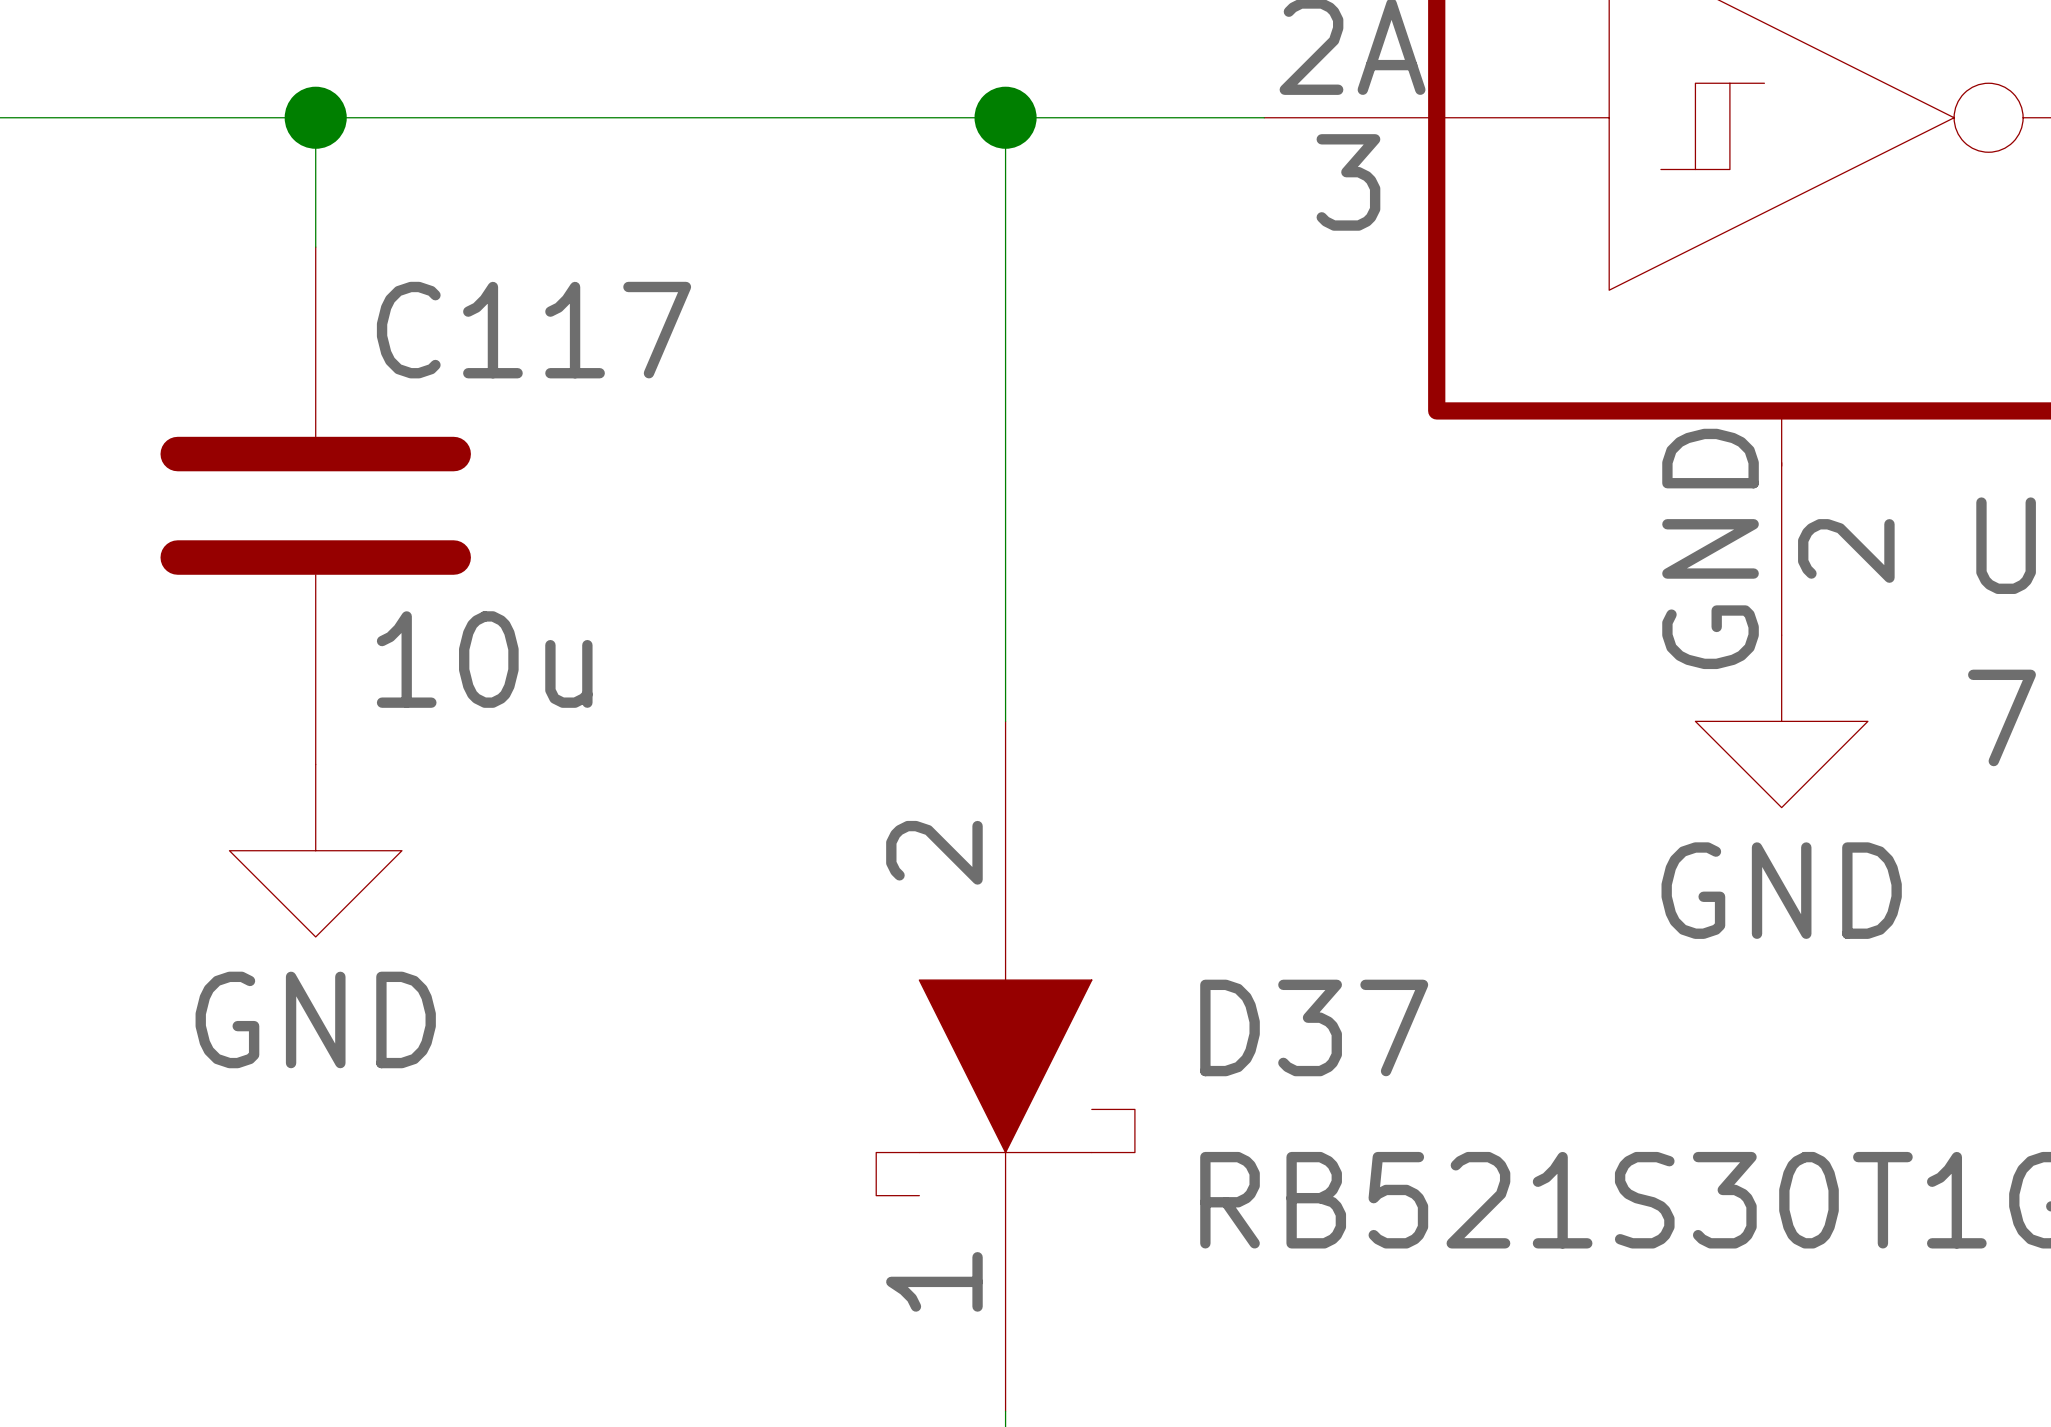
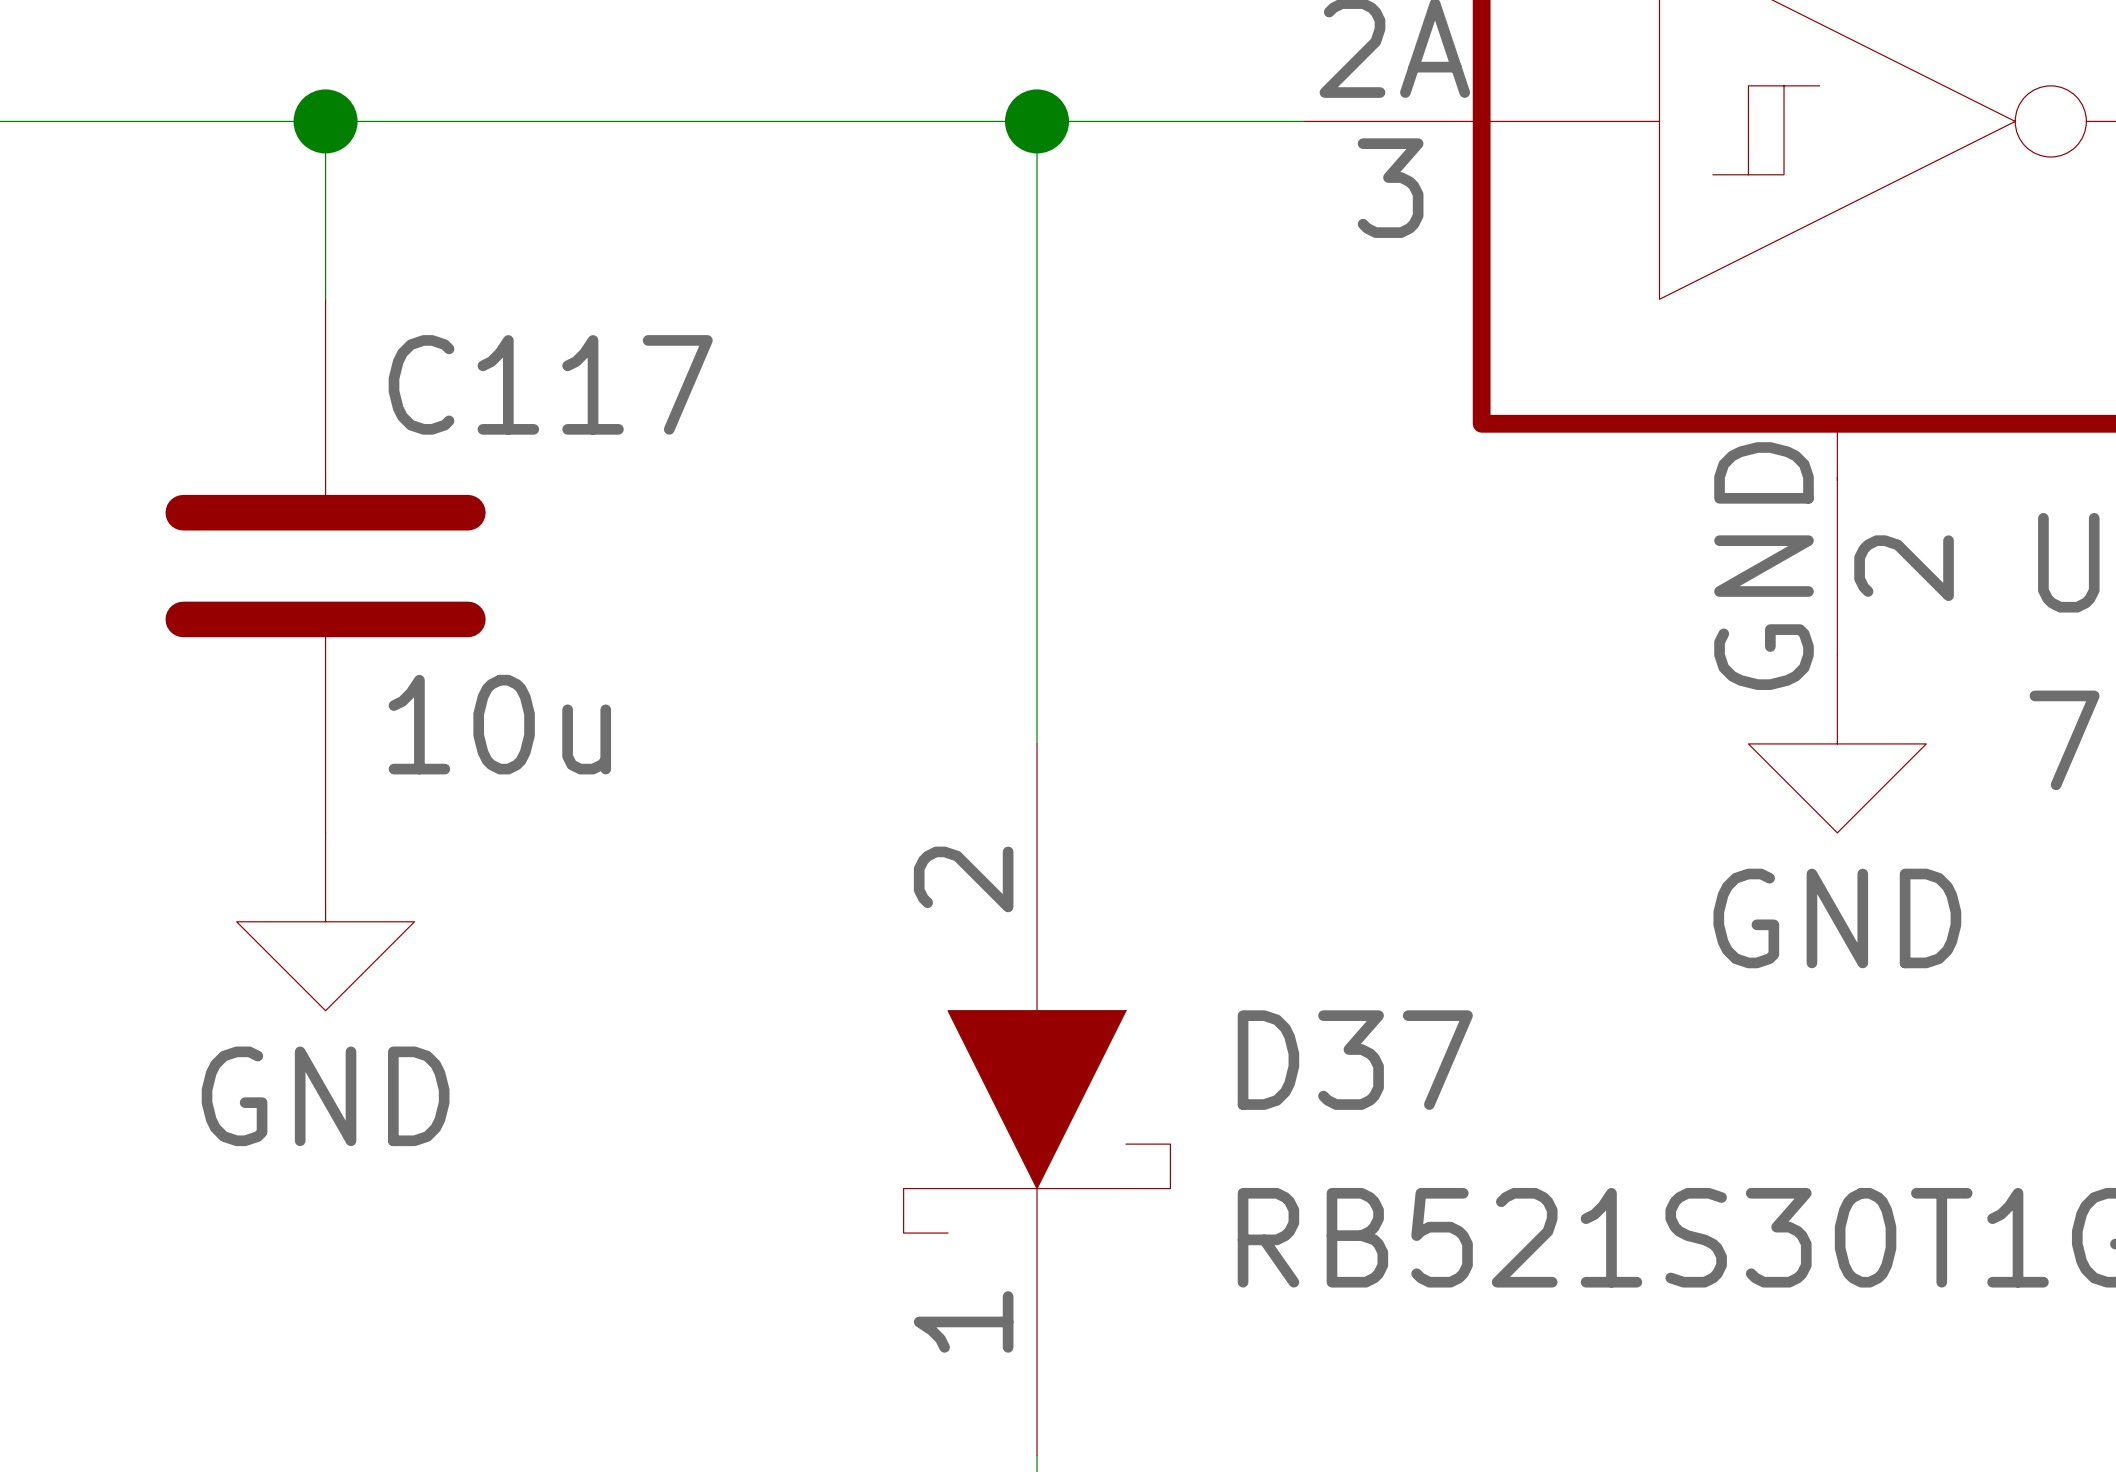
C117 position: (315, 505) -> (325, 566)
power symbol position: GND (315, 850) -> GND (325, 921)

